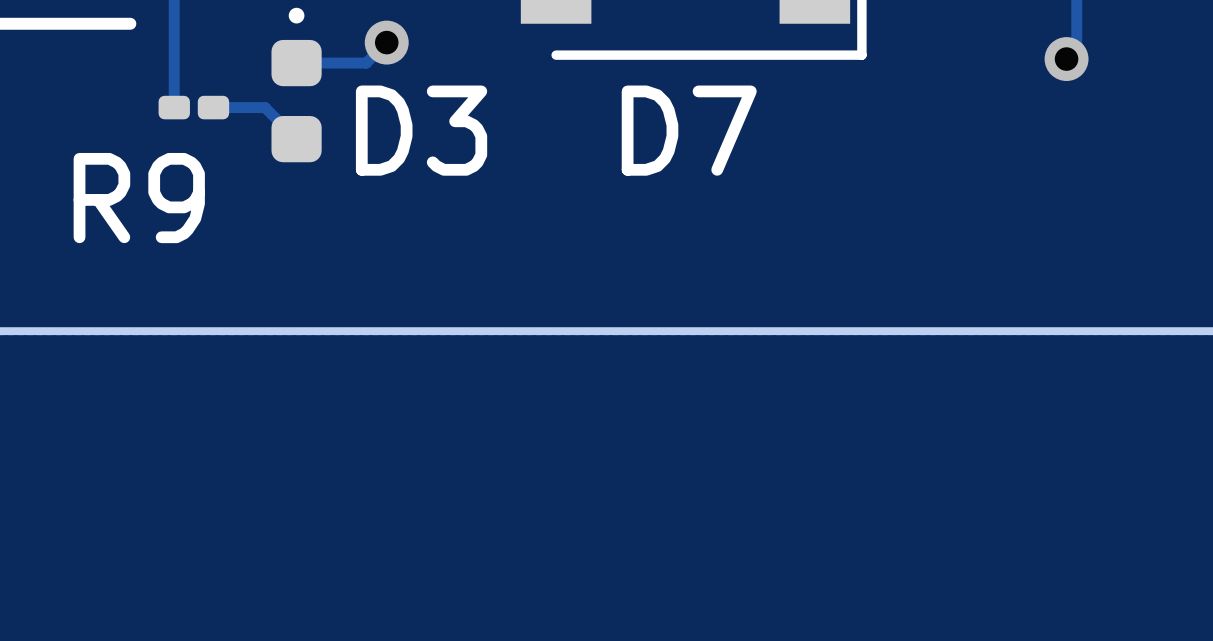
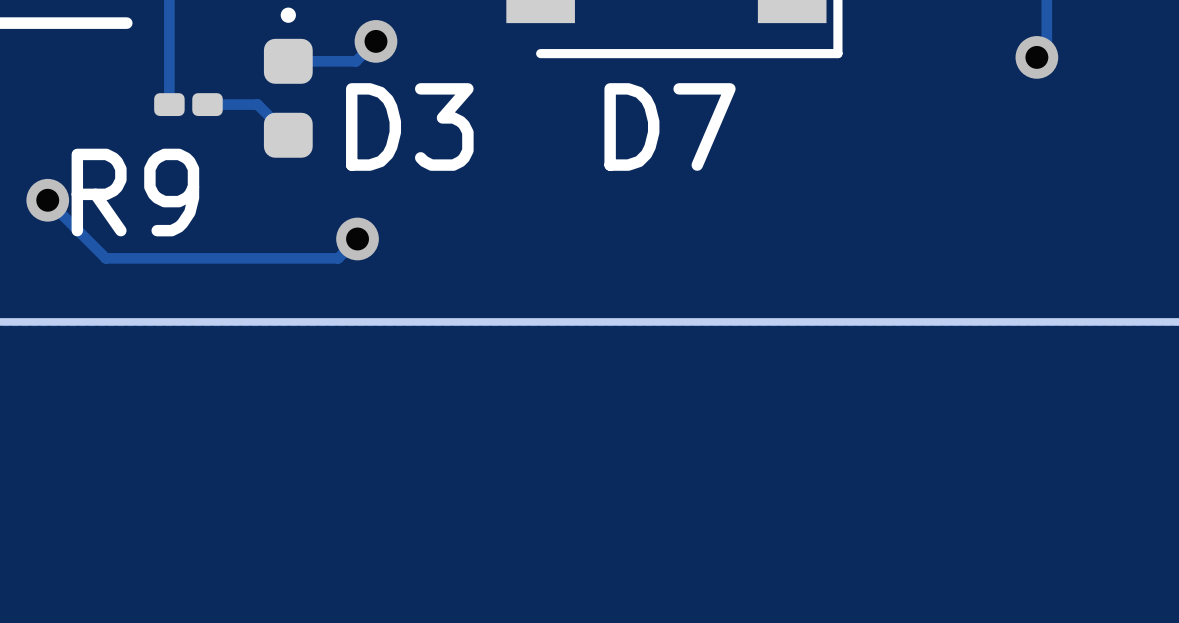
track: none -> (47, 200) (105, 258) (338, 258) (357, 238)
via: none -> (47, 200)
via: none -> (357, 238)

